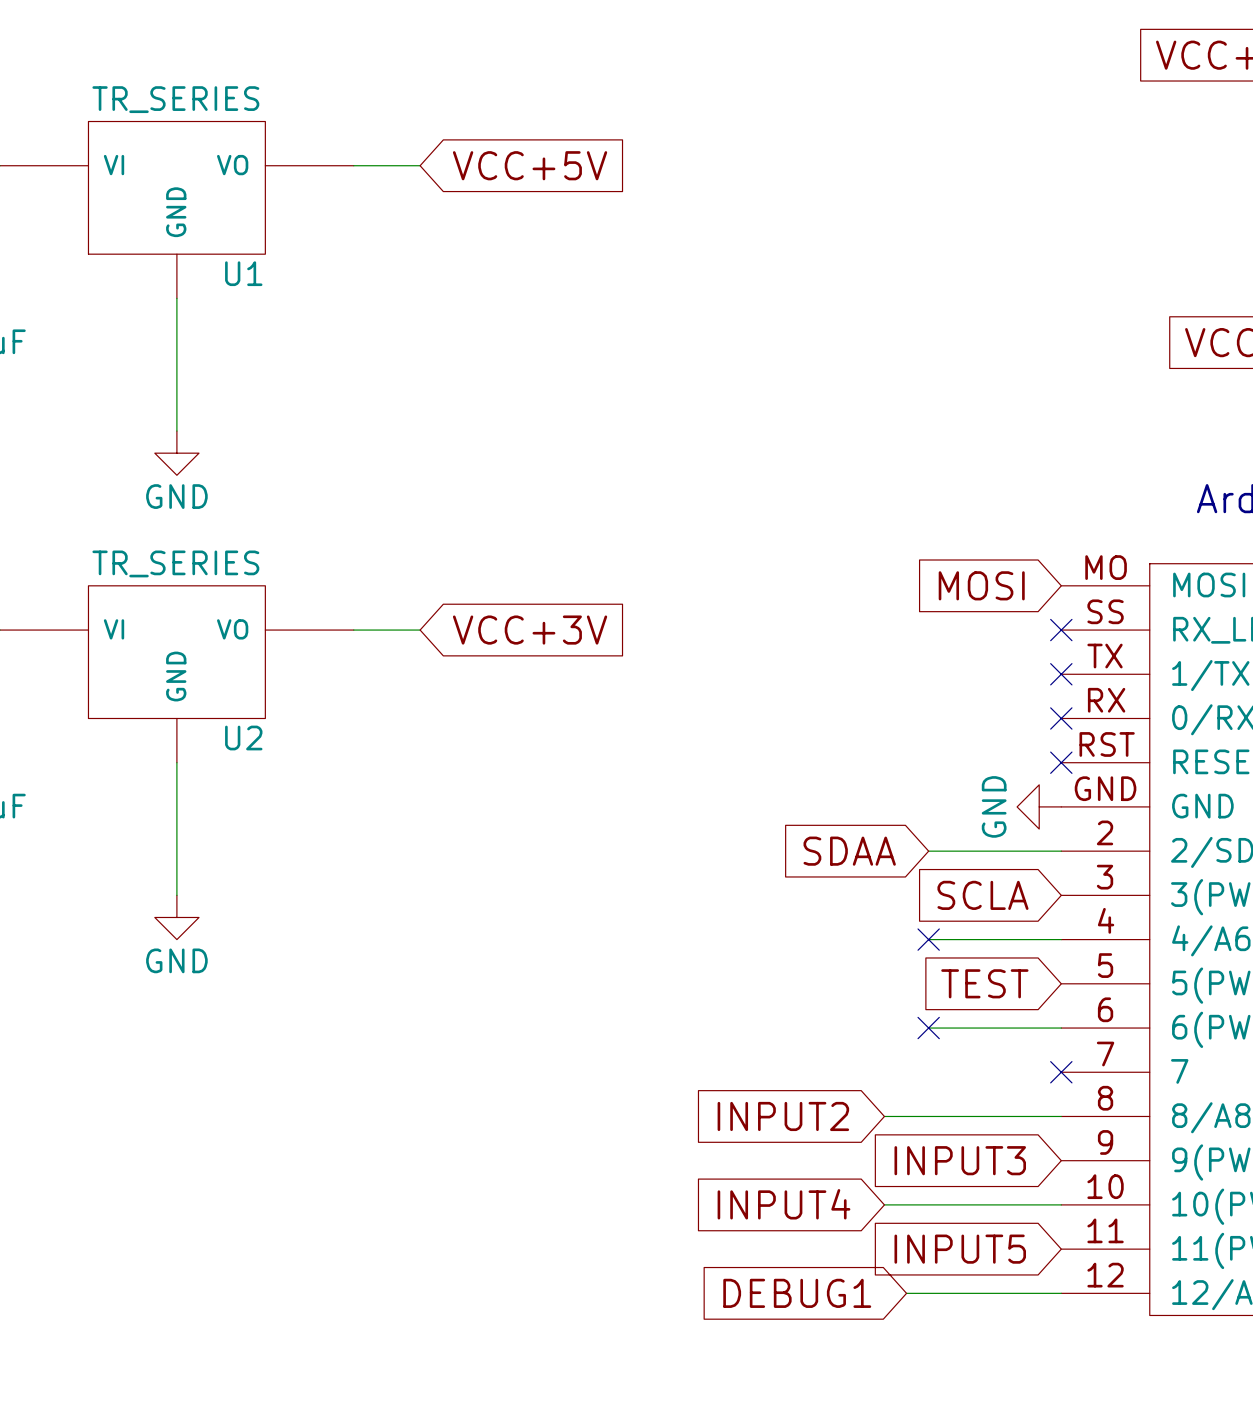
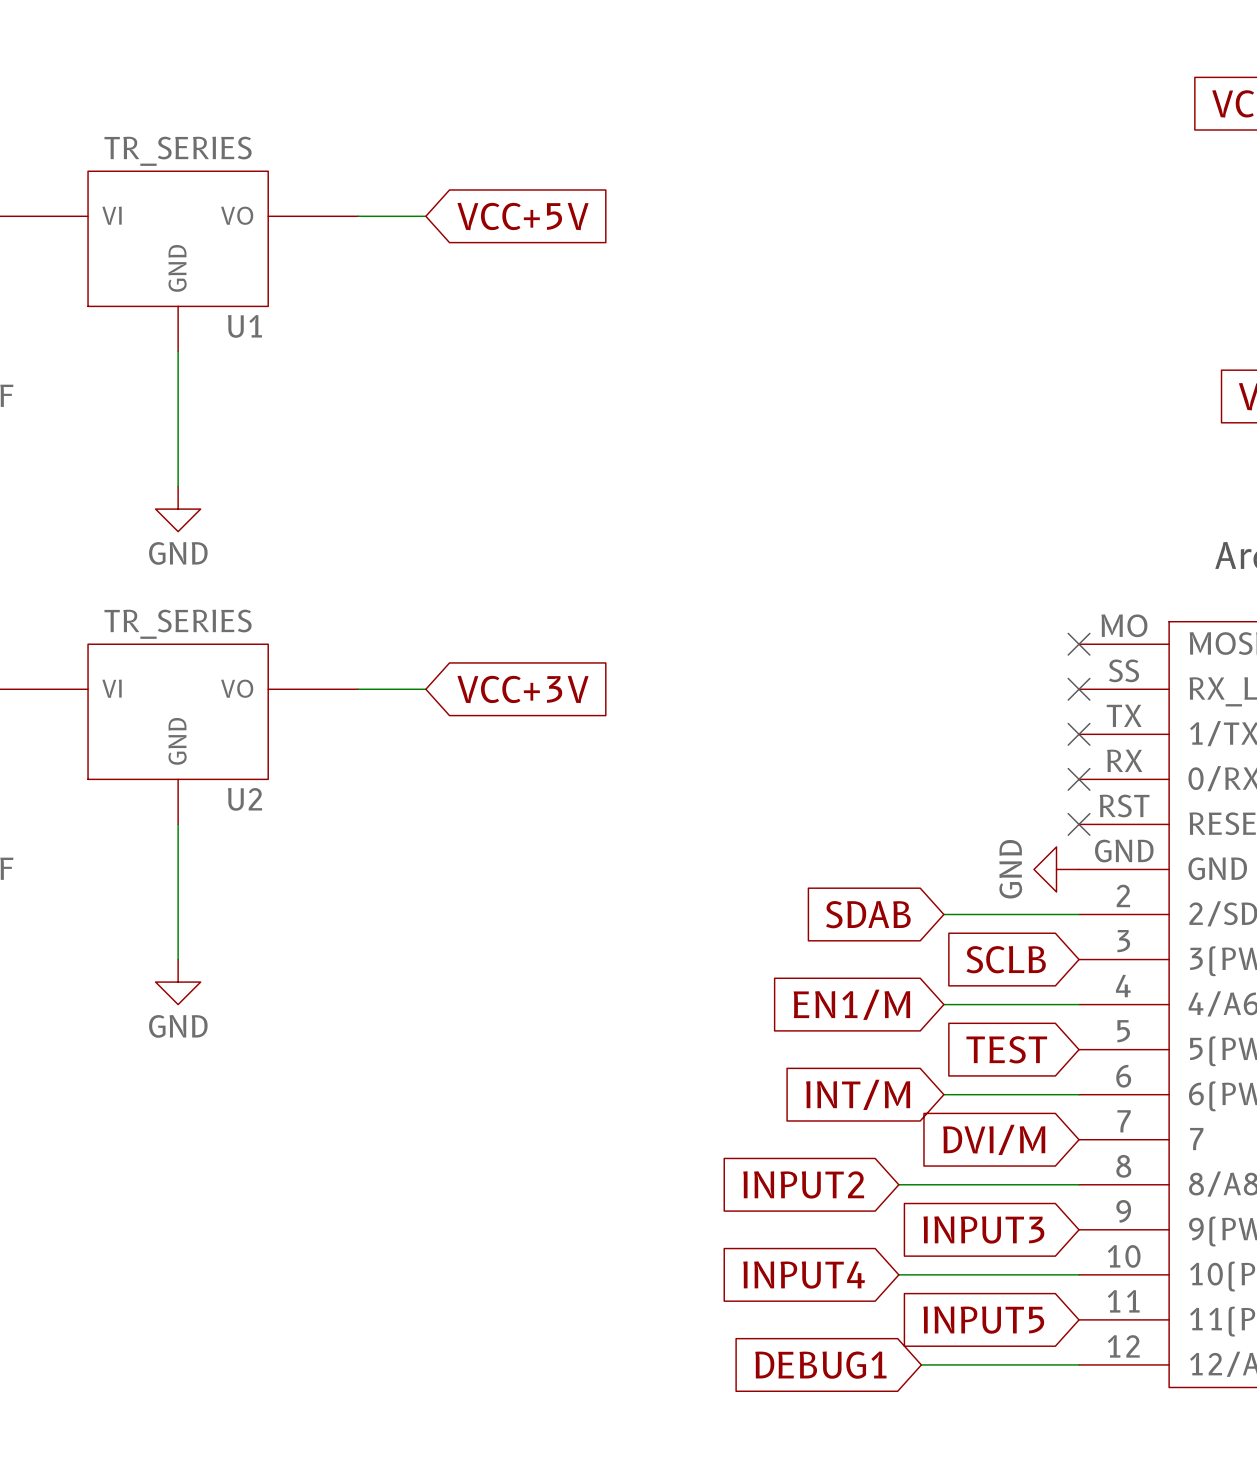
global label: MOSI (981, 585) -> none
no-connect mark: none -> (1079, 644)
global label: SDAA (849, 851) -> SDAB (868, 914)
global label: SCLA (982, 895) -> SCLB (1006, 959)
no-connect mark: (928, 939) -> none
global label: none -> EN1/M (851, 1004)
no-connect mark: (928, 1028) -> none
global label: none -> INT/M (858, 1094)
no-connect mark: (1061, 1072) -> none
global label: none -> DVI/M (994, 1139)

